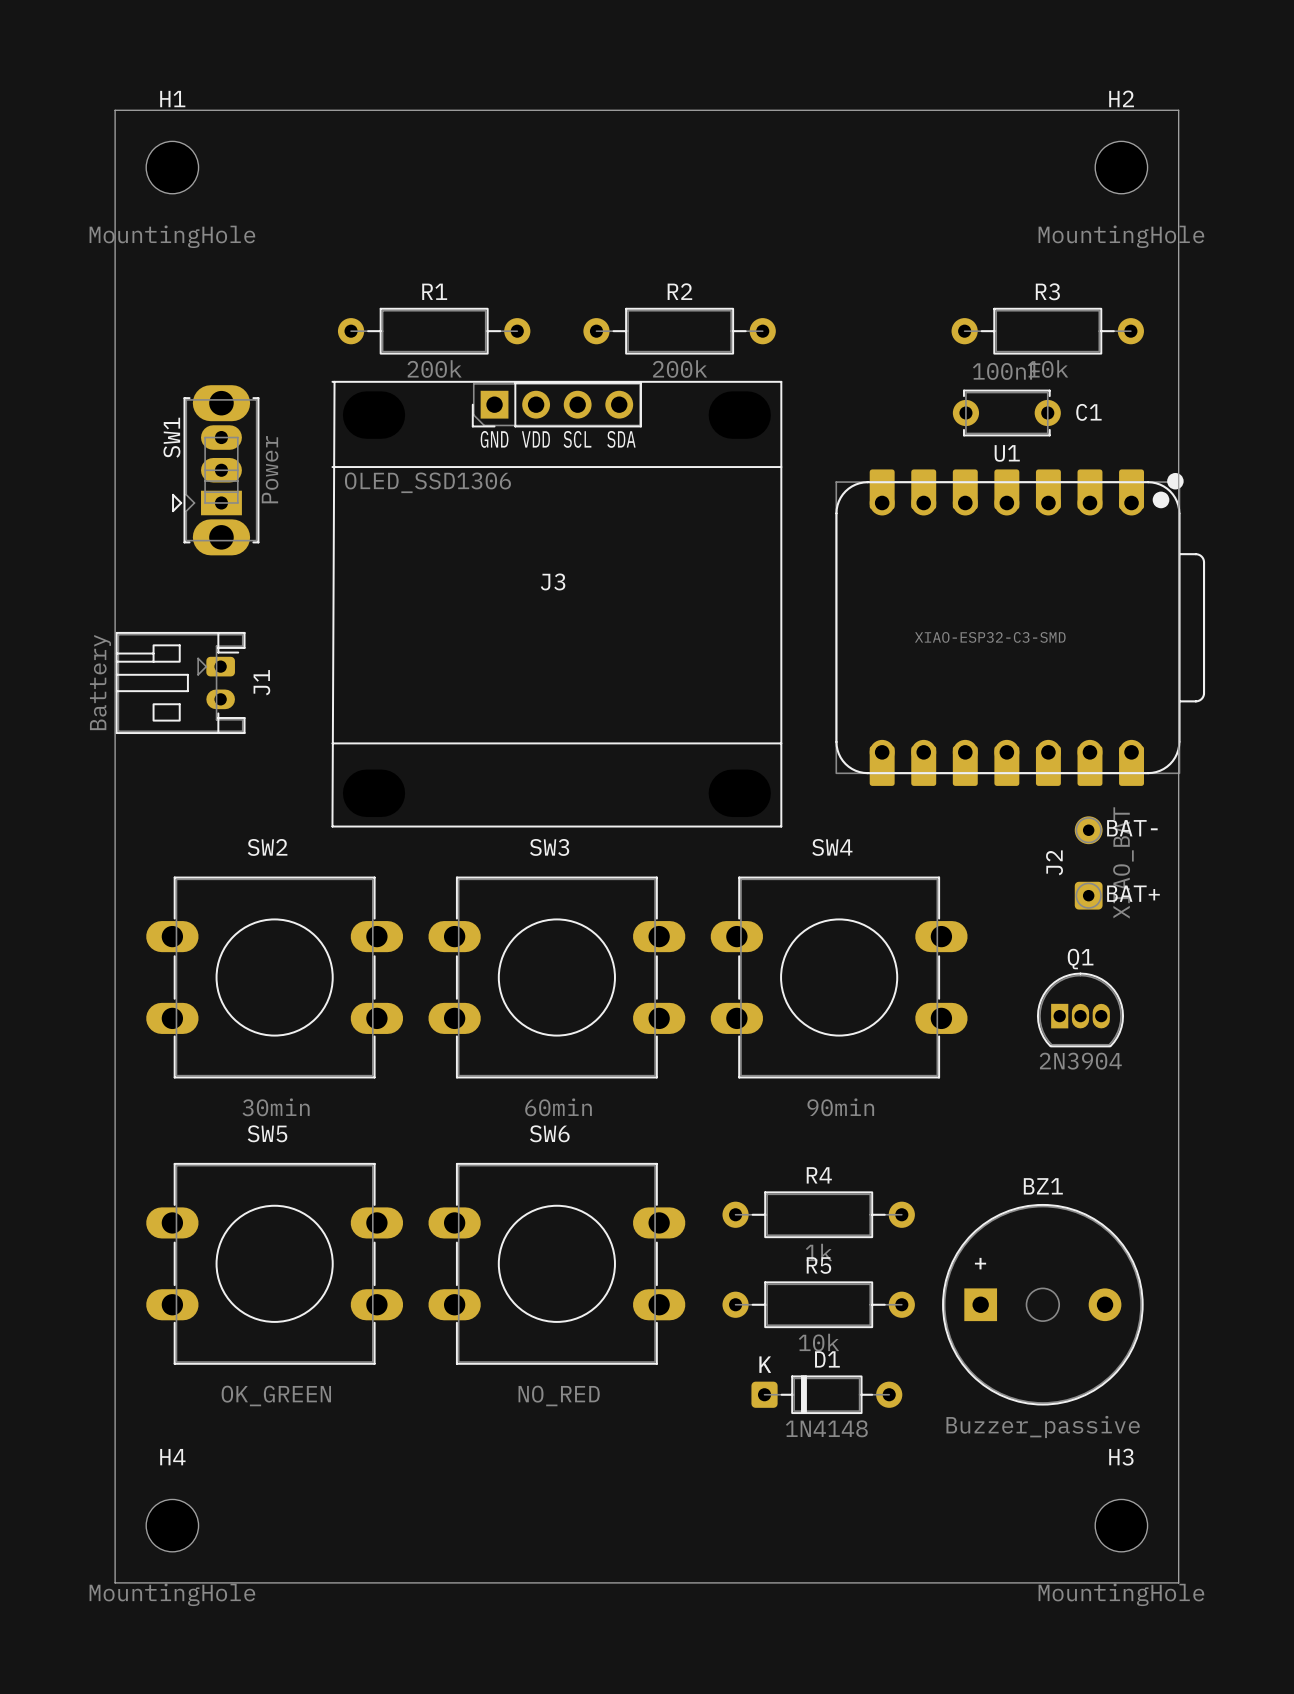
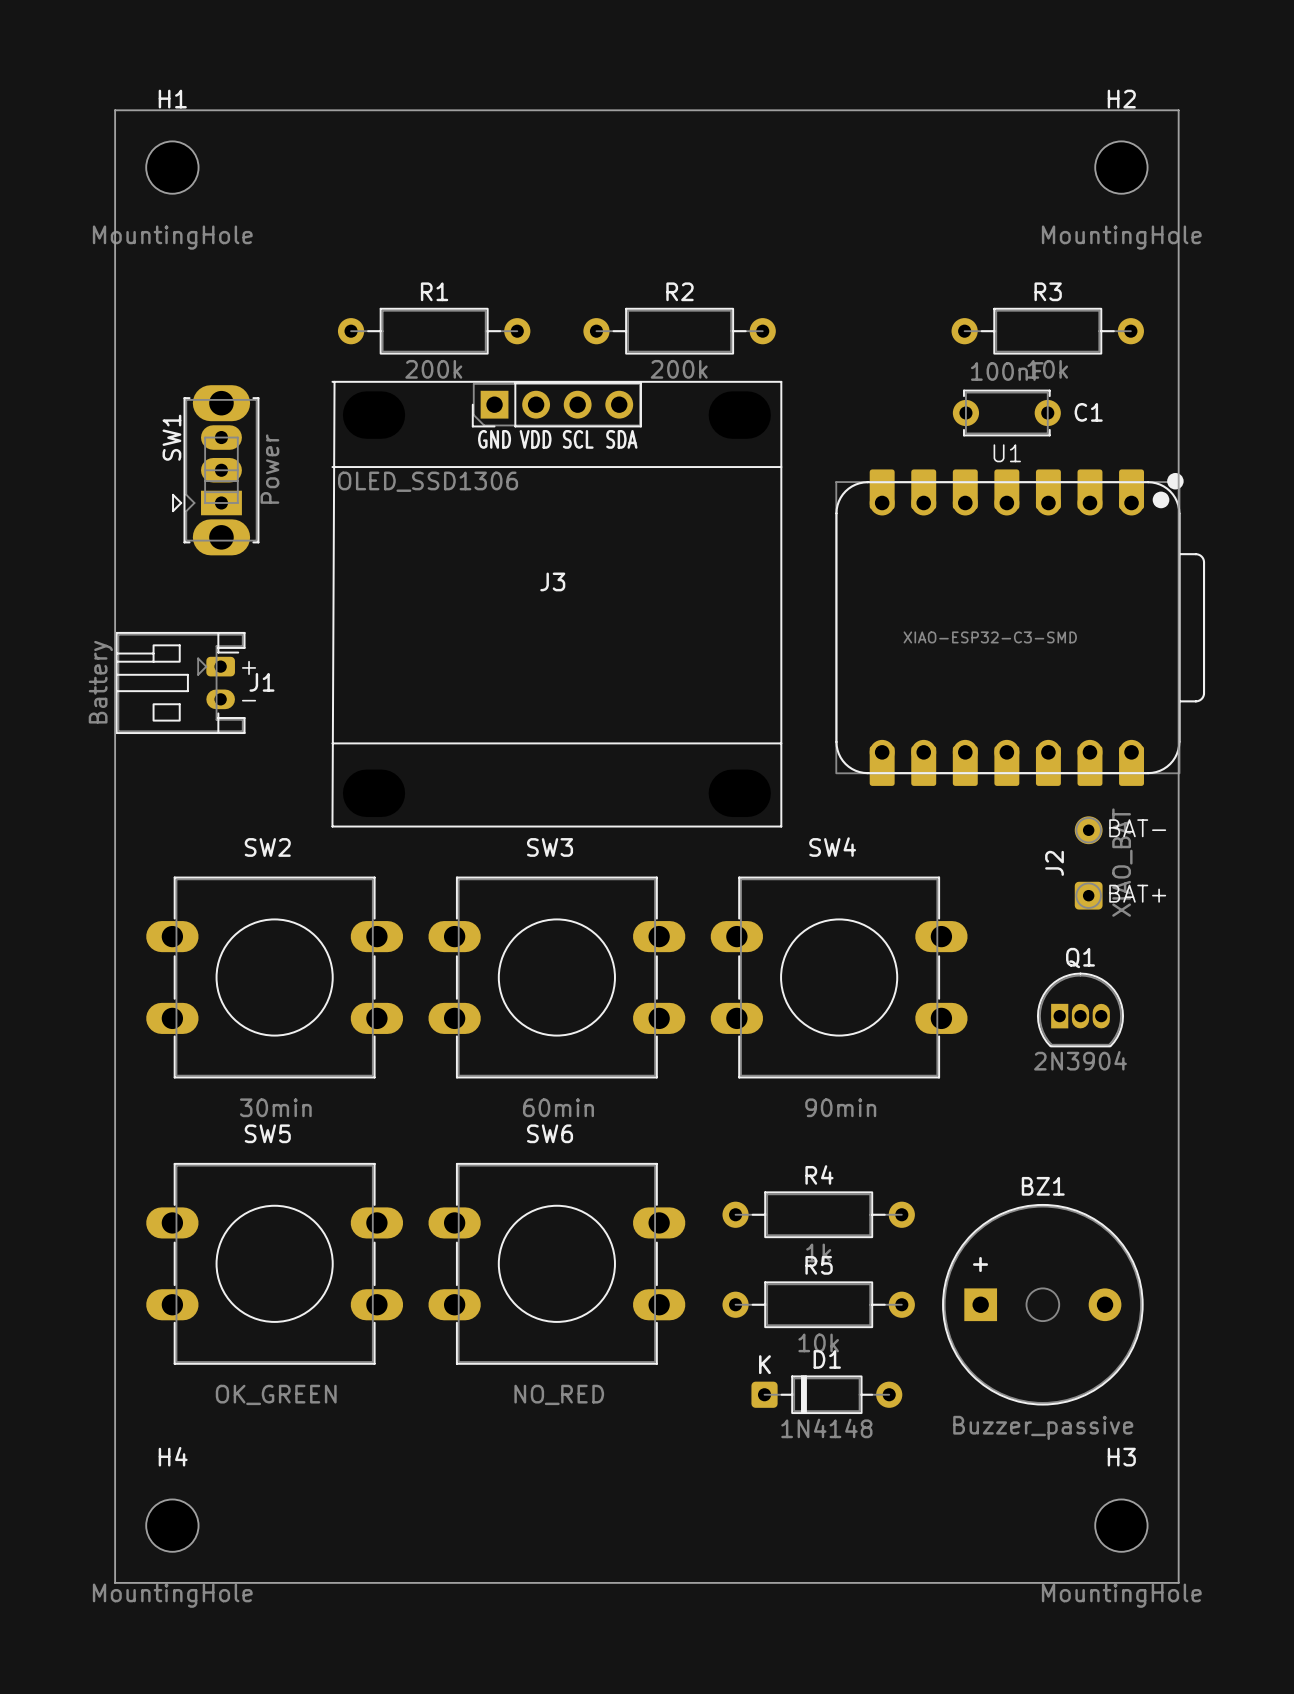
text: none -> + (249, 667)
J1 name rotation: 0° (261, 682) -> 90° clockwise (261, 682)
text: none -> - (249, 700)

